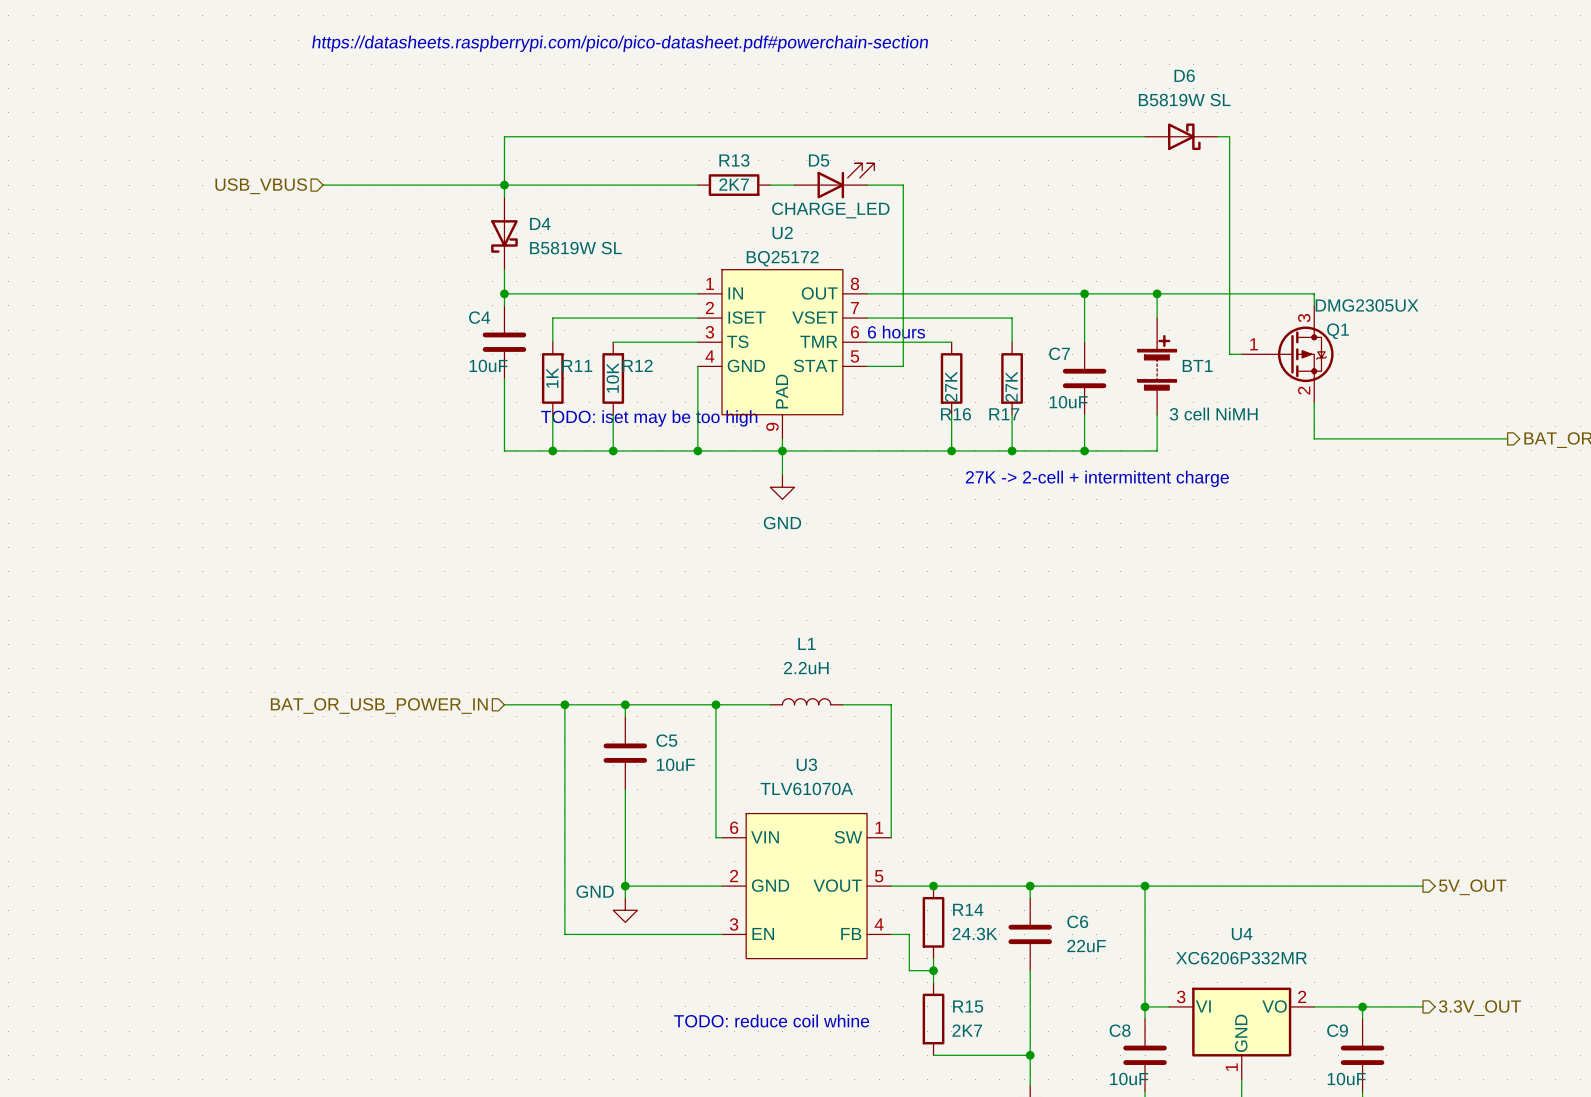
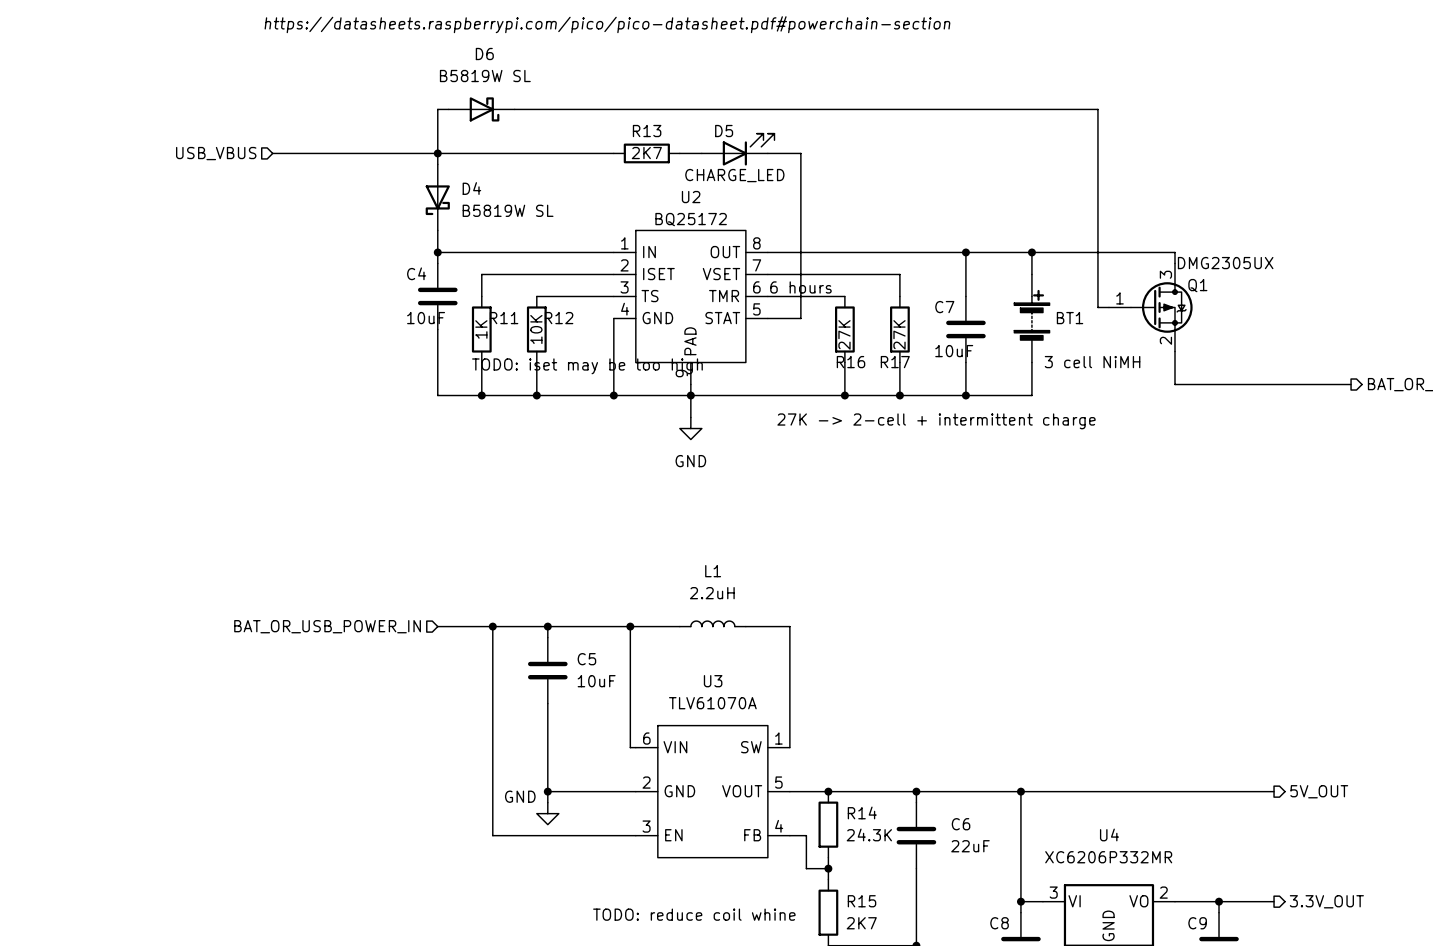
D6 position: (1181, 136) -> (481, 109)

